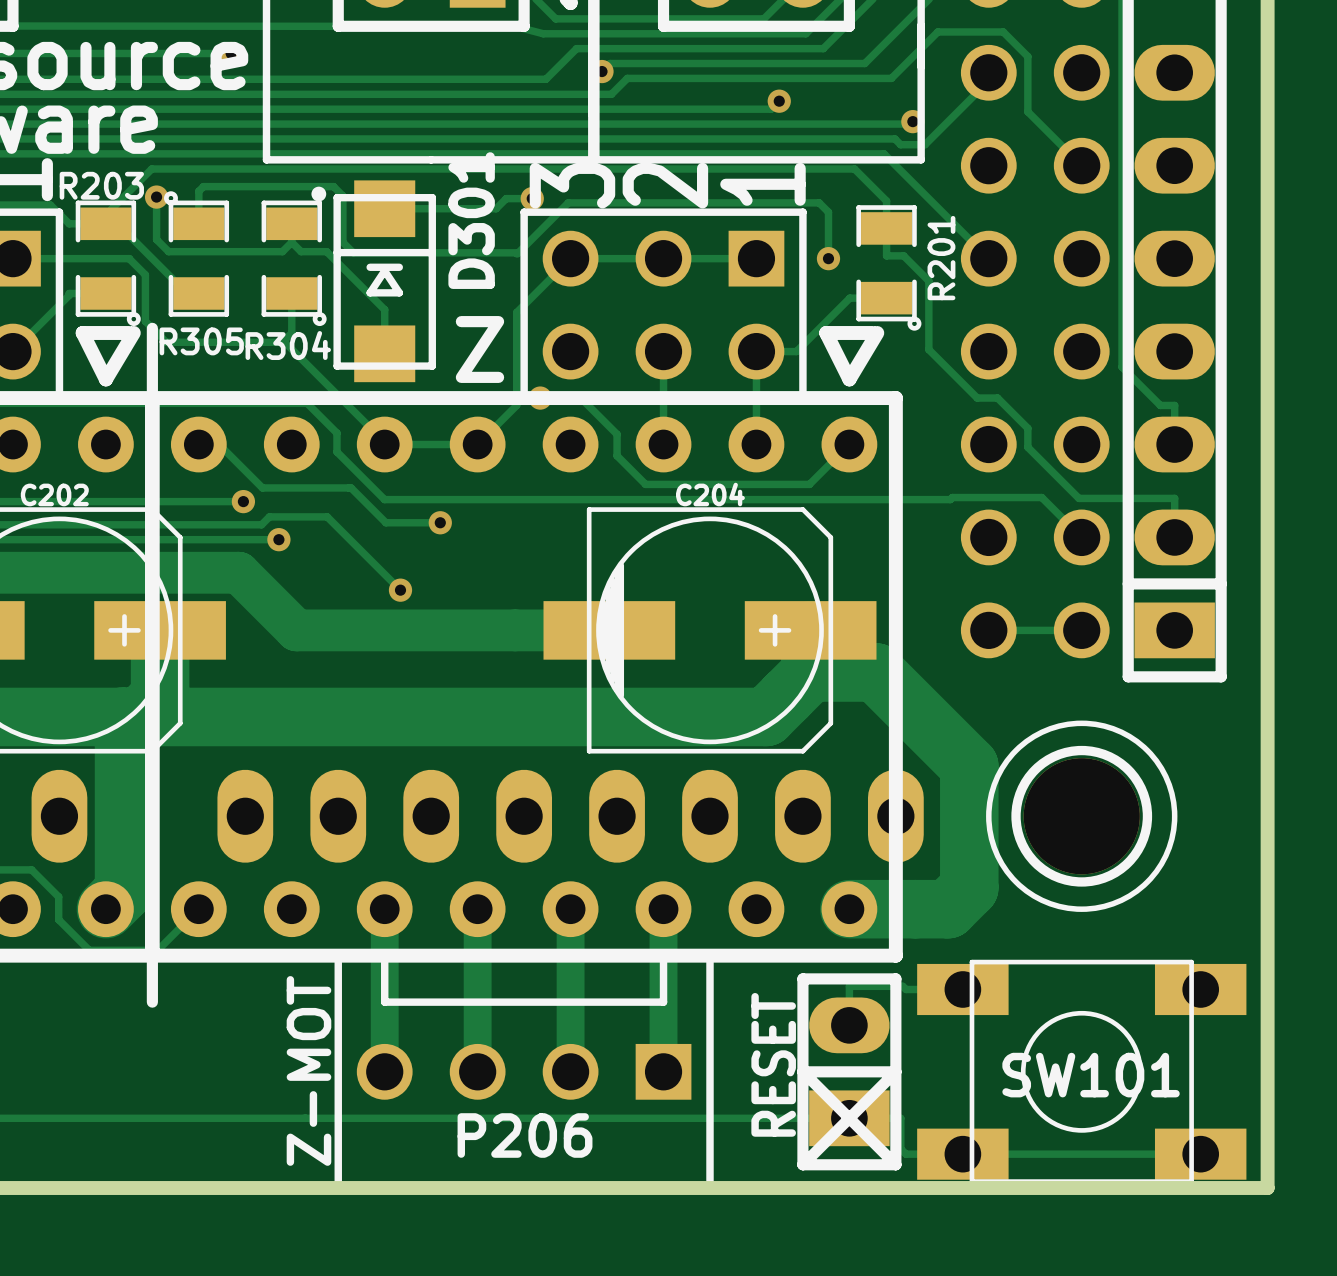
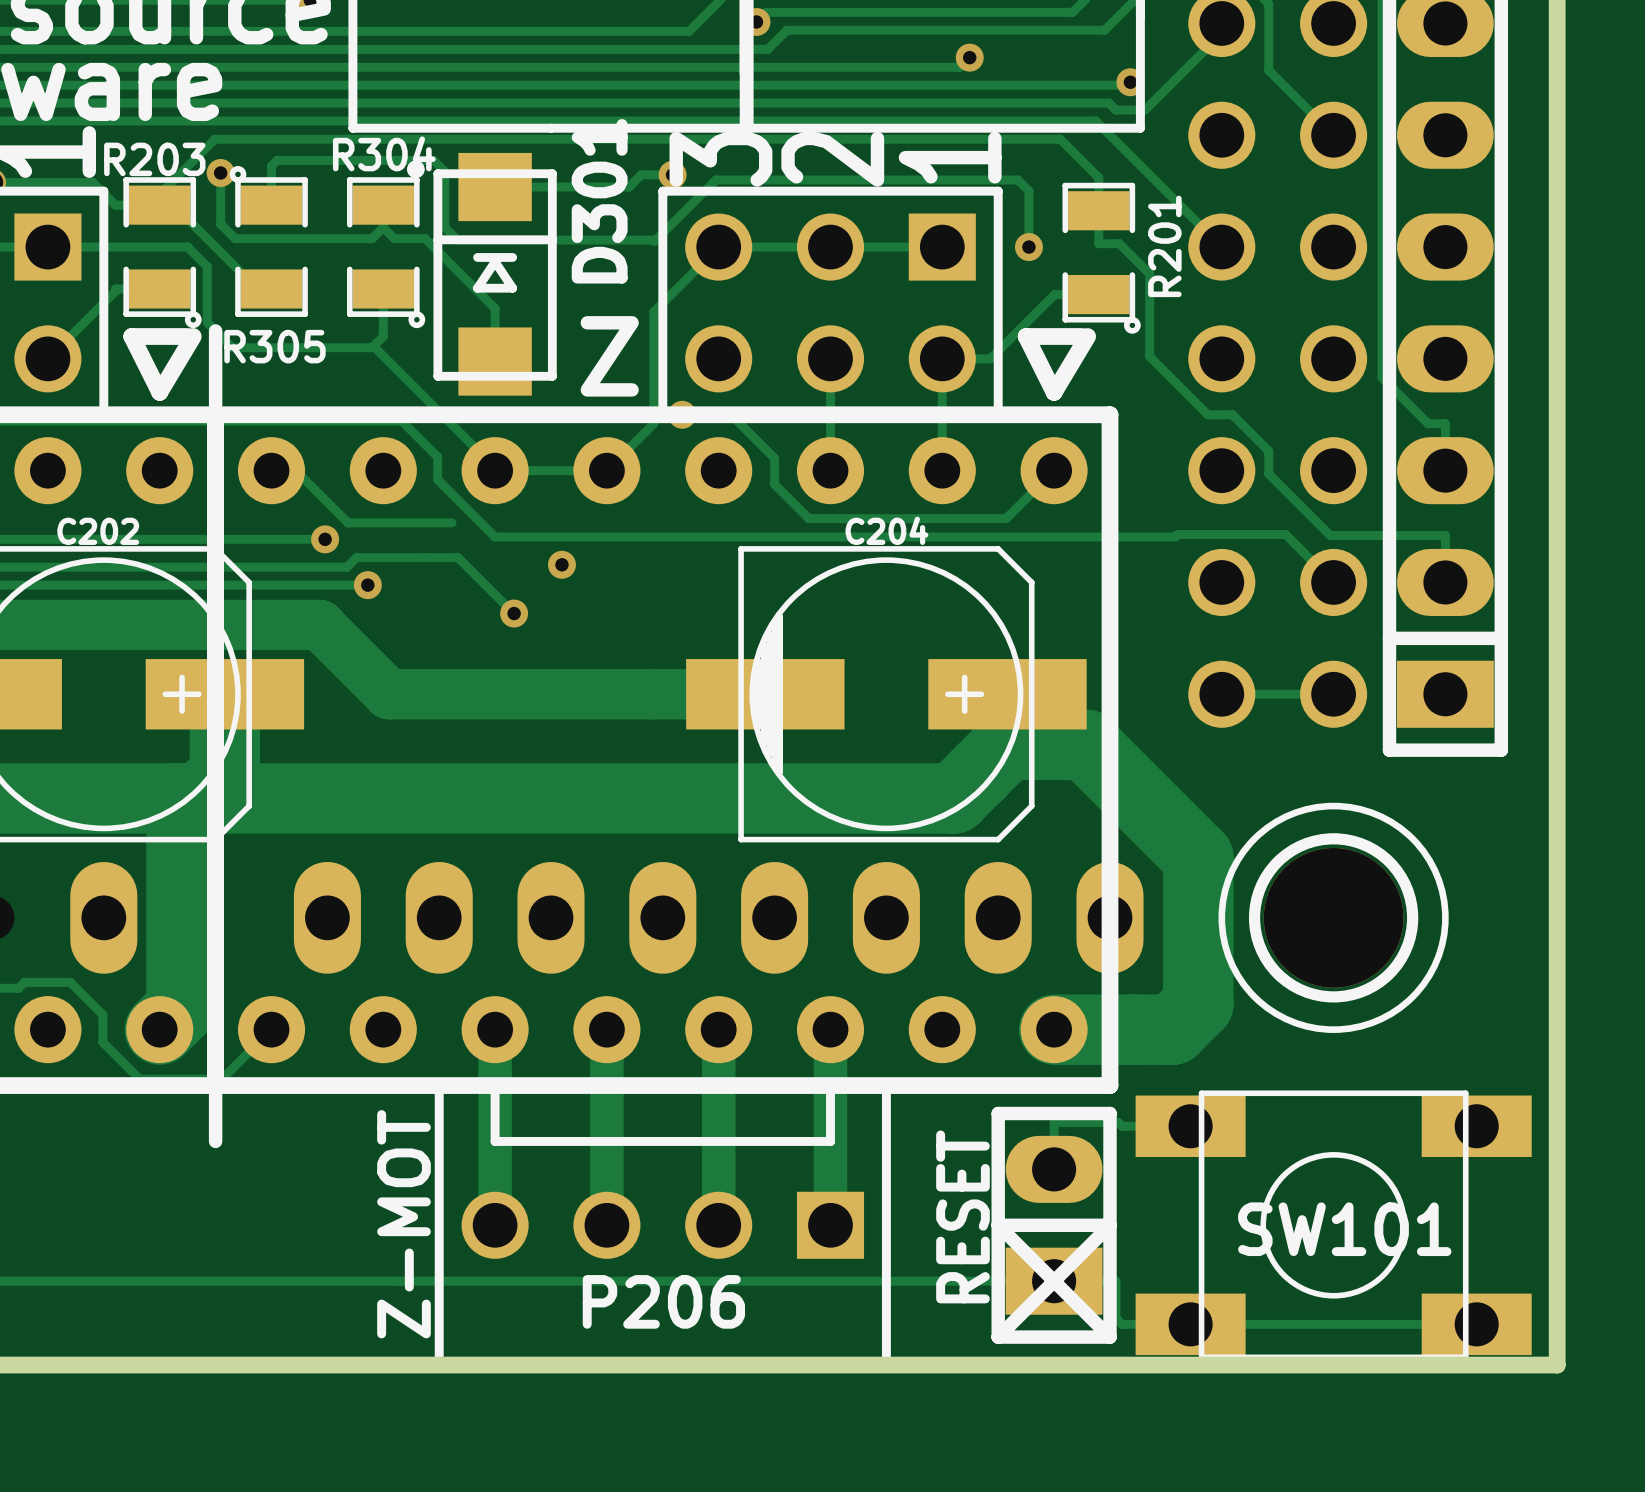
R304 name position: R304 (288, 345) -> R304 (384, 153)
track: (348, 487) (351, 487) (385, 522) (440, 522) -> none
track: (327, 516) (400, 590) -> (425, 557) (458, 557) (513, 613)
via position: (400, 590) -> (514, 613)

